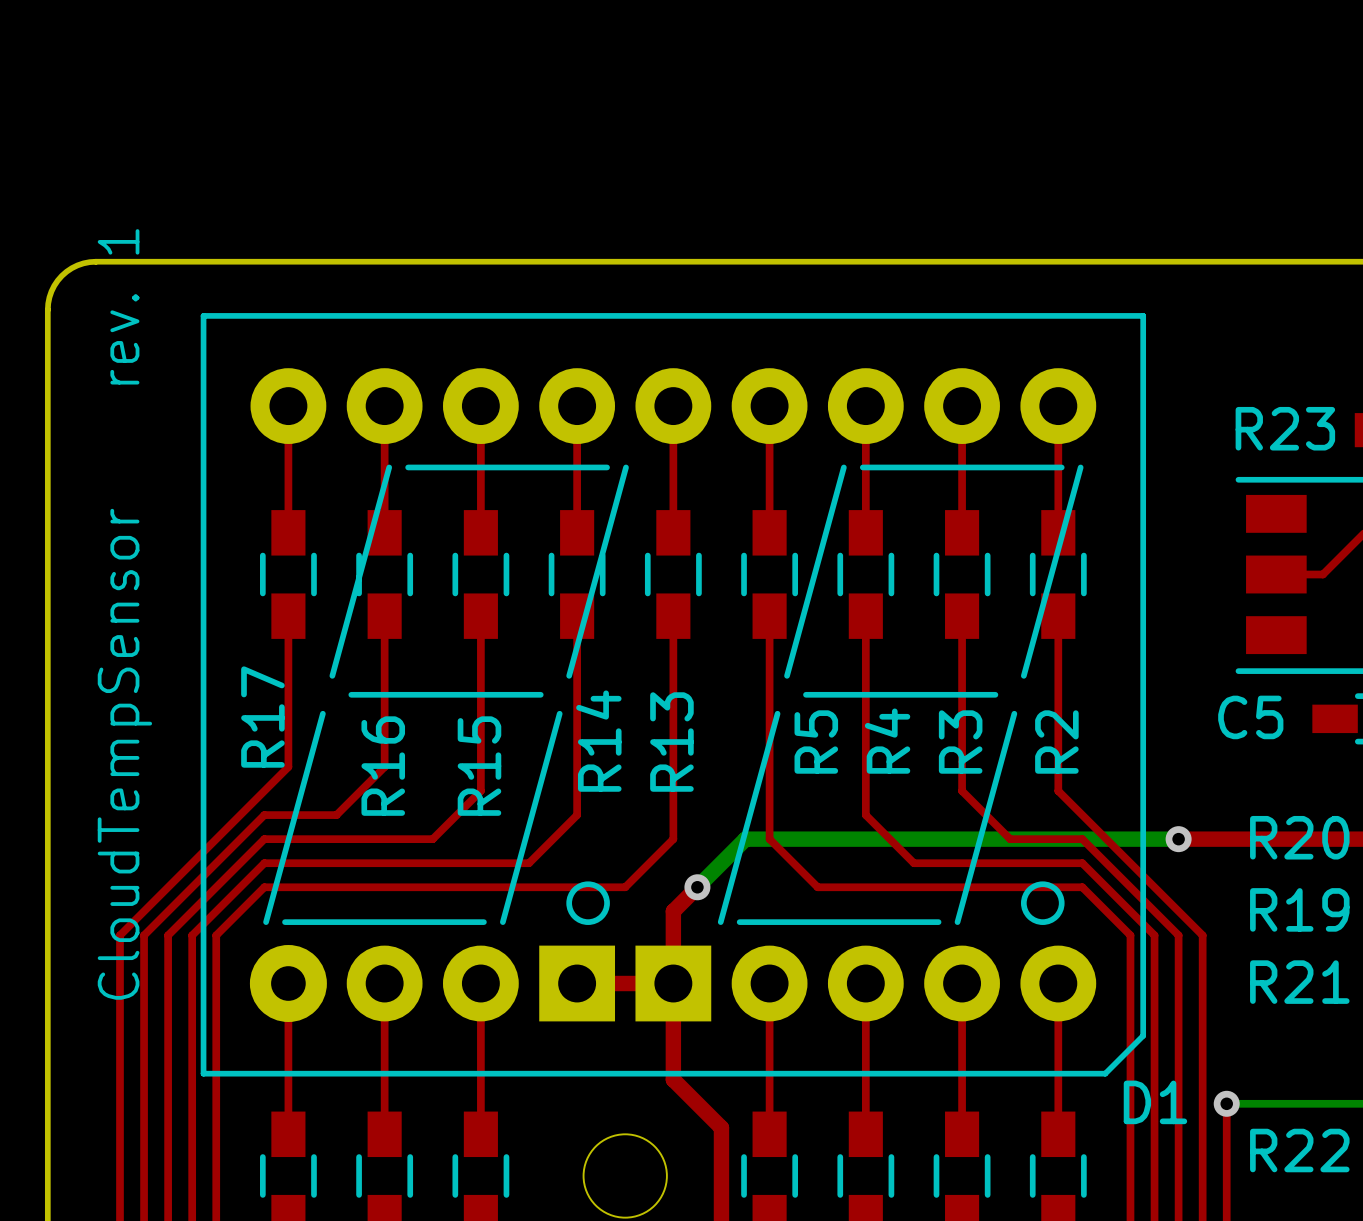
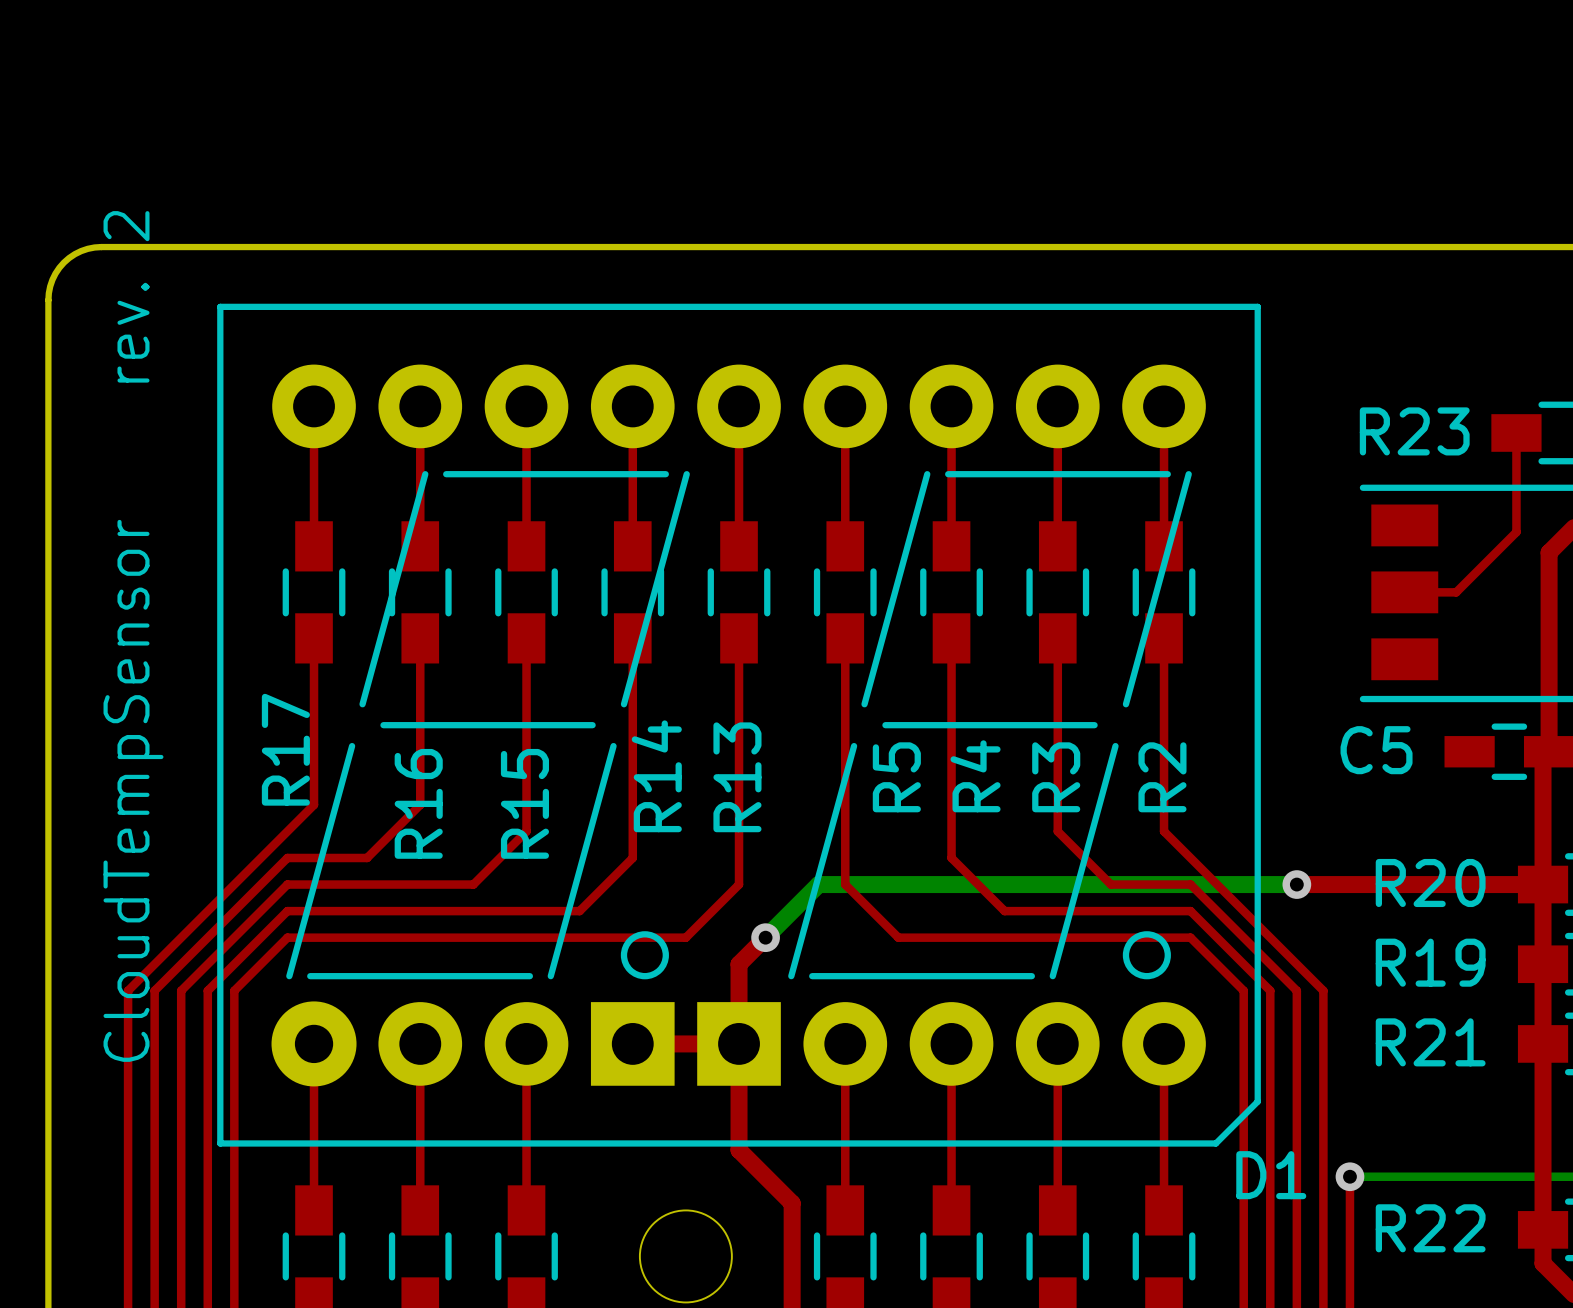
text: CloudTempSensor rev. 1 (124, 614) -> CloudTempSensor rev. 2 (133, 636)

